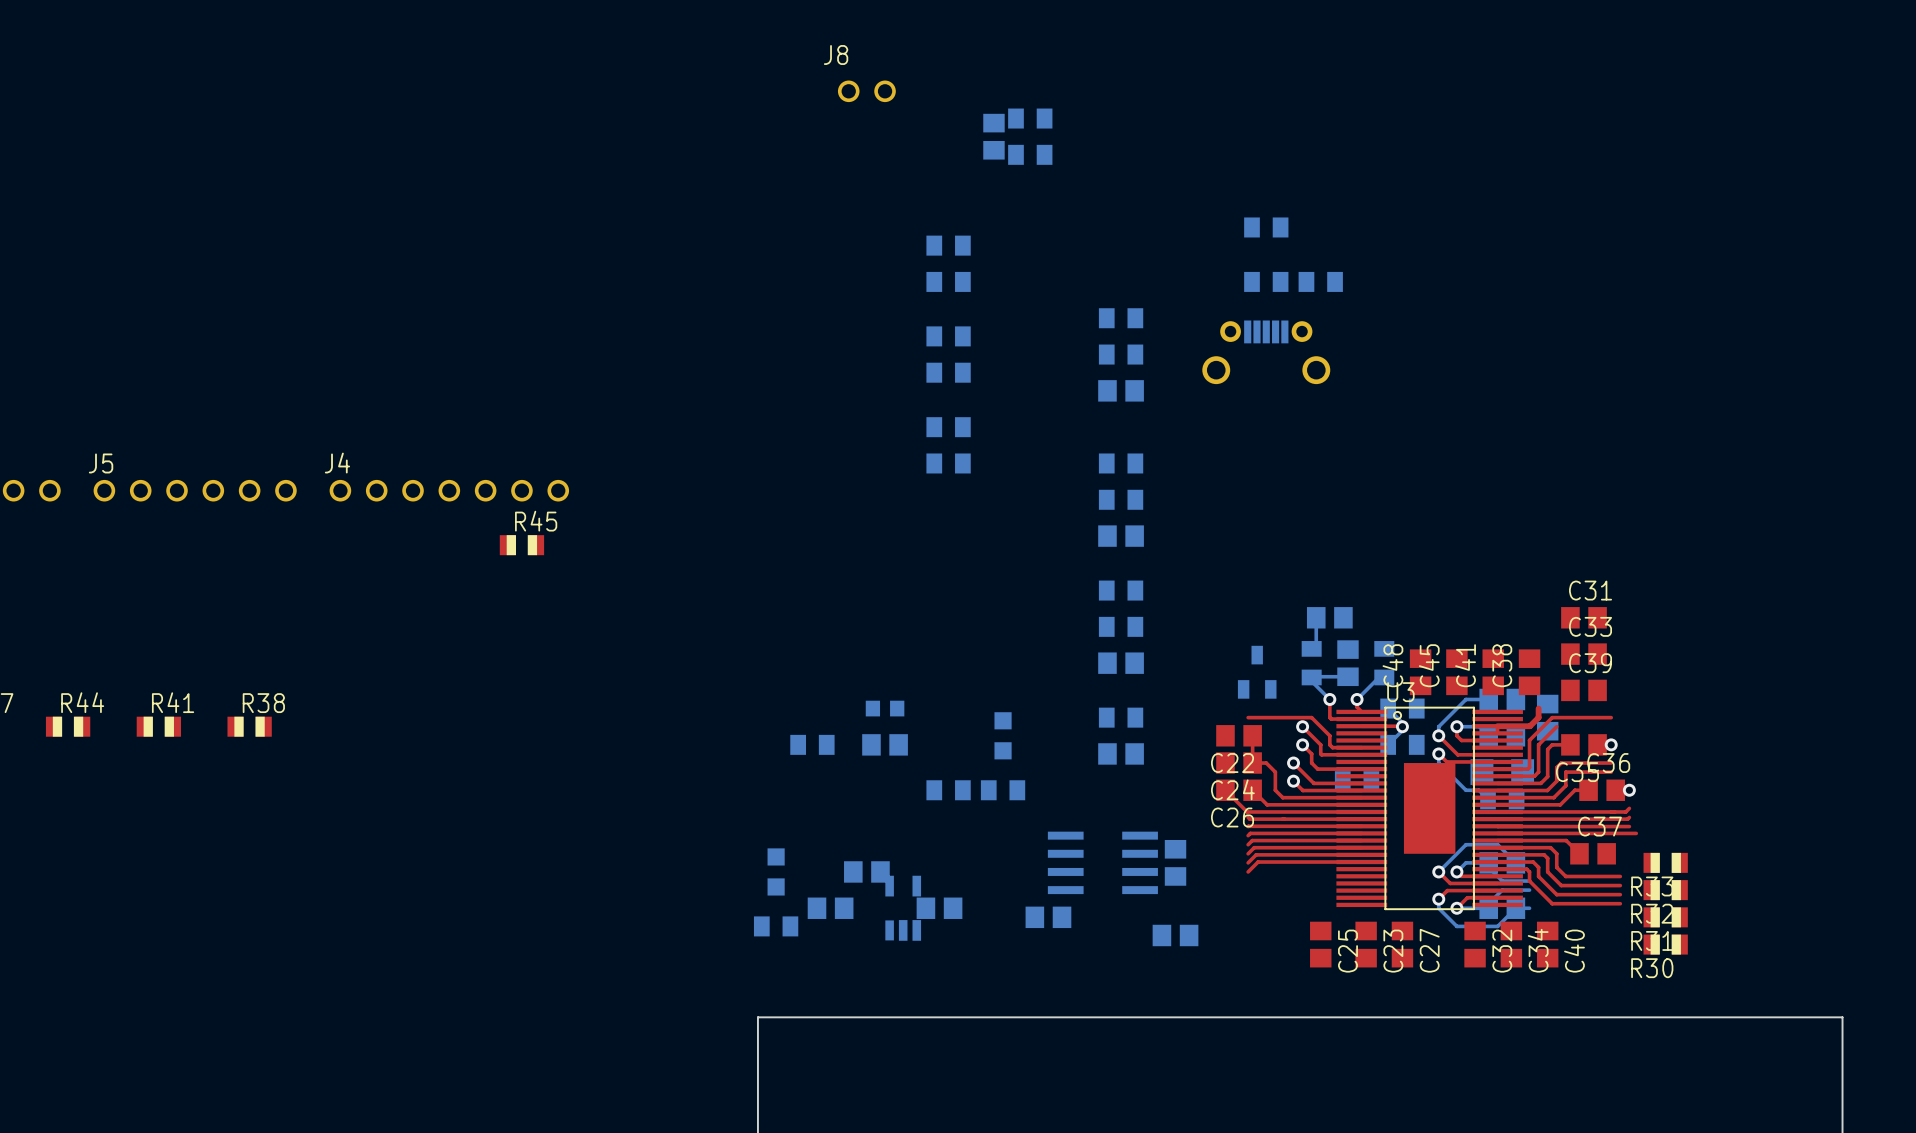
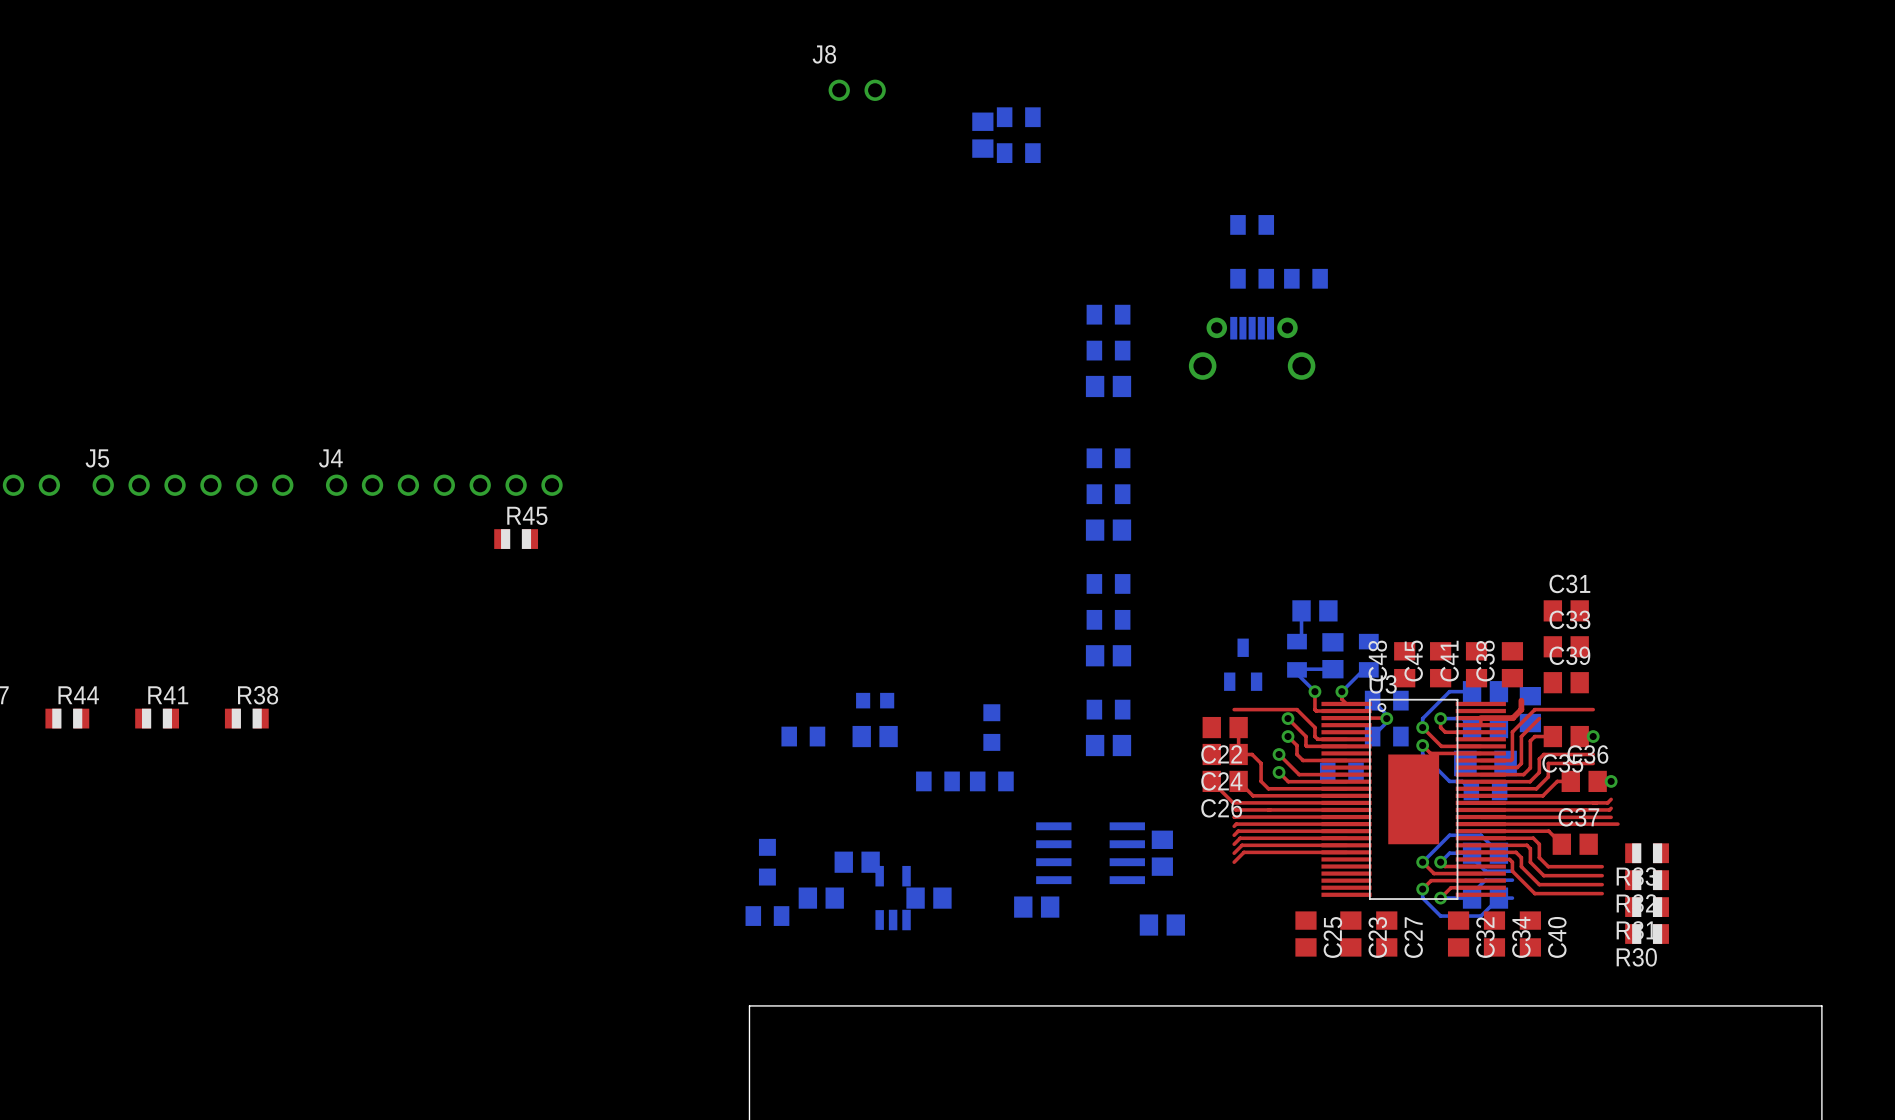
part: (948, 245) -> none
part: (948, 281) -> none
part: (948, 336) -> none
part: (948, 372) -> none
part: (948, 427) -> none
part: (948, 463) -> none

